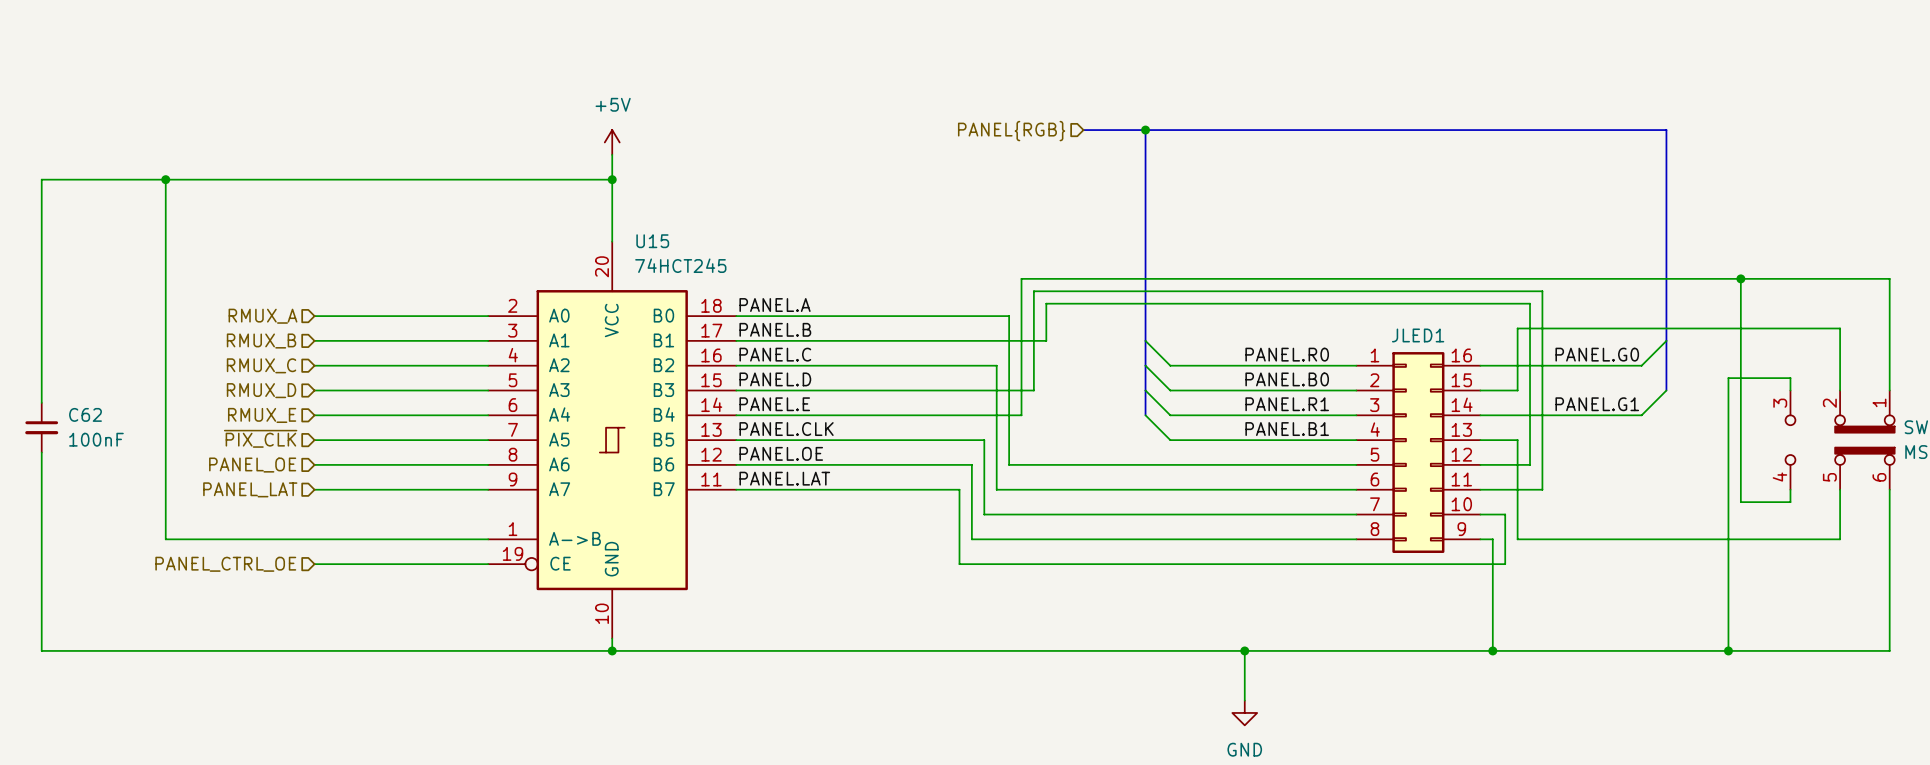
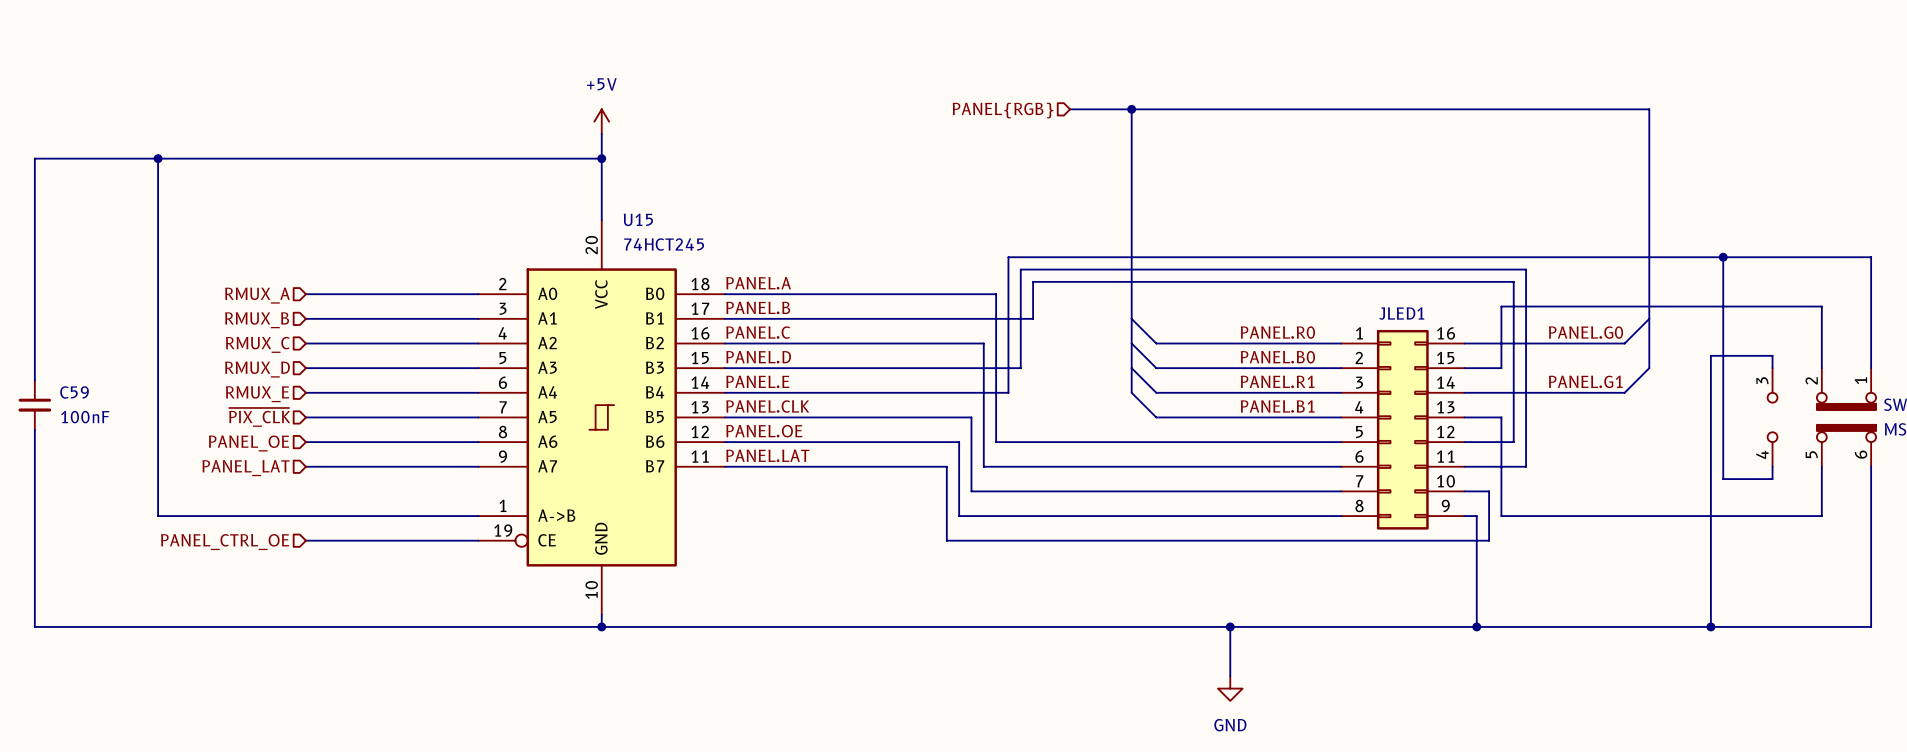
C62 name: C62 (85, 414) -> C59 (74, 392)

